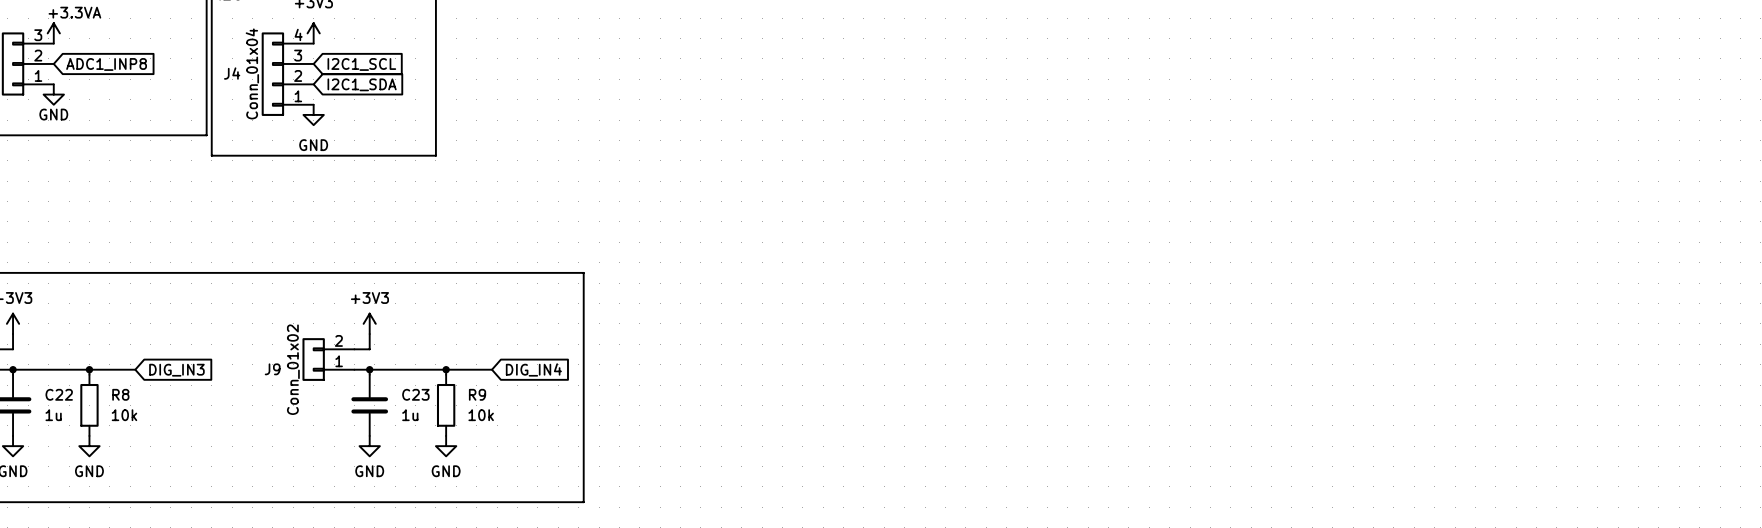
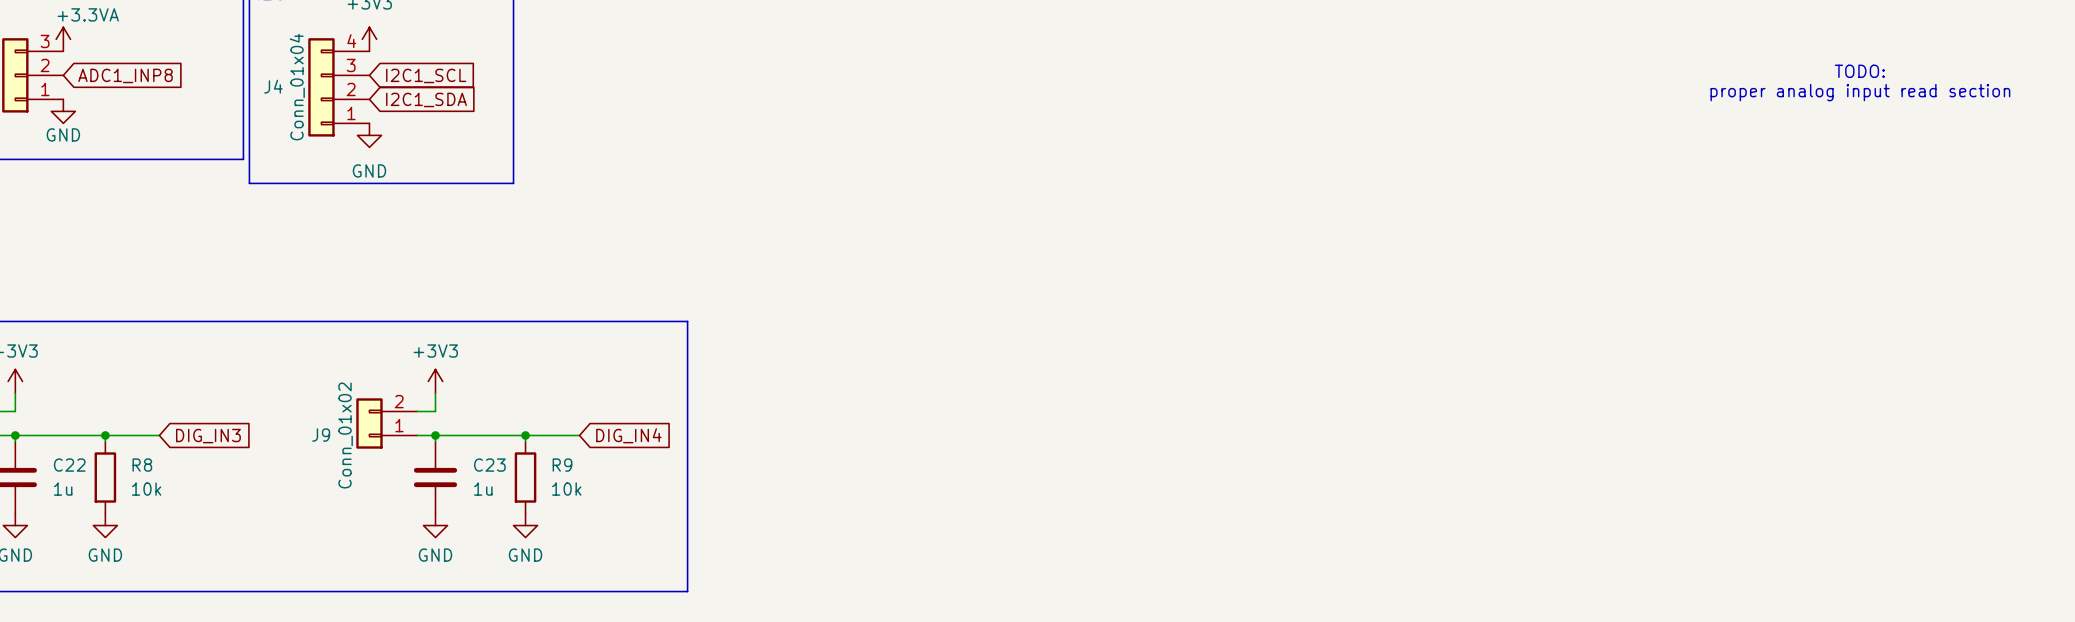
text: none -> TODO: (1859, 71)
text: none -> proper analog input read section (1860, 92)

